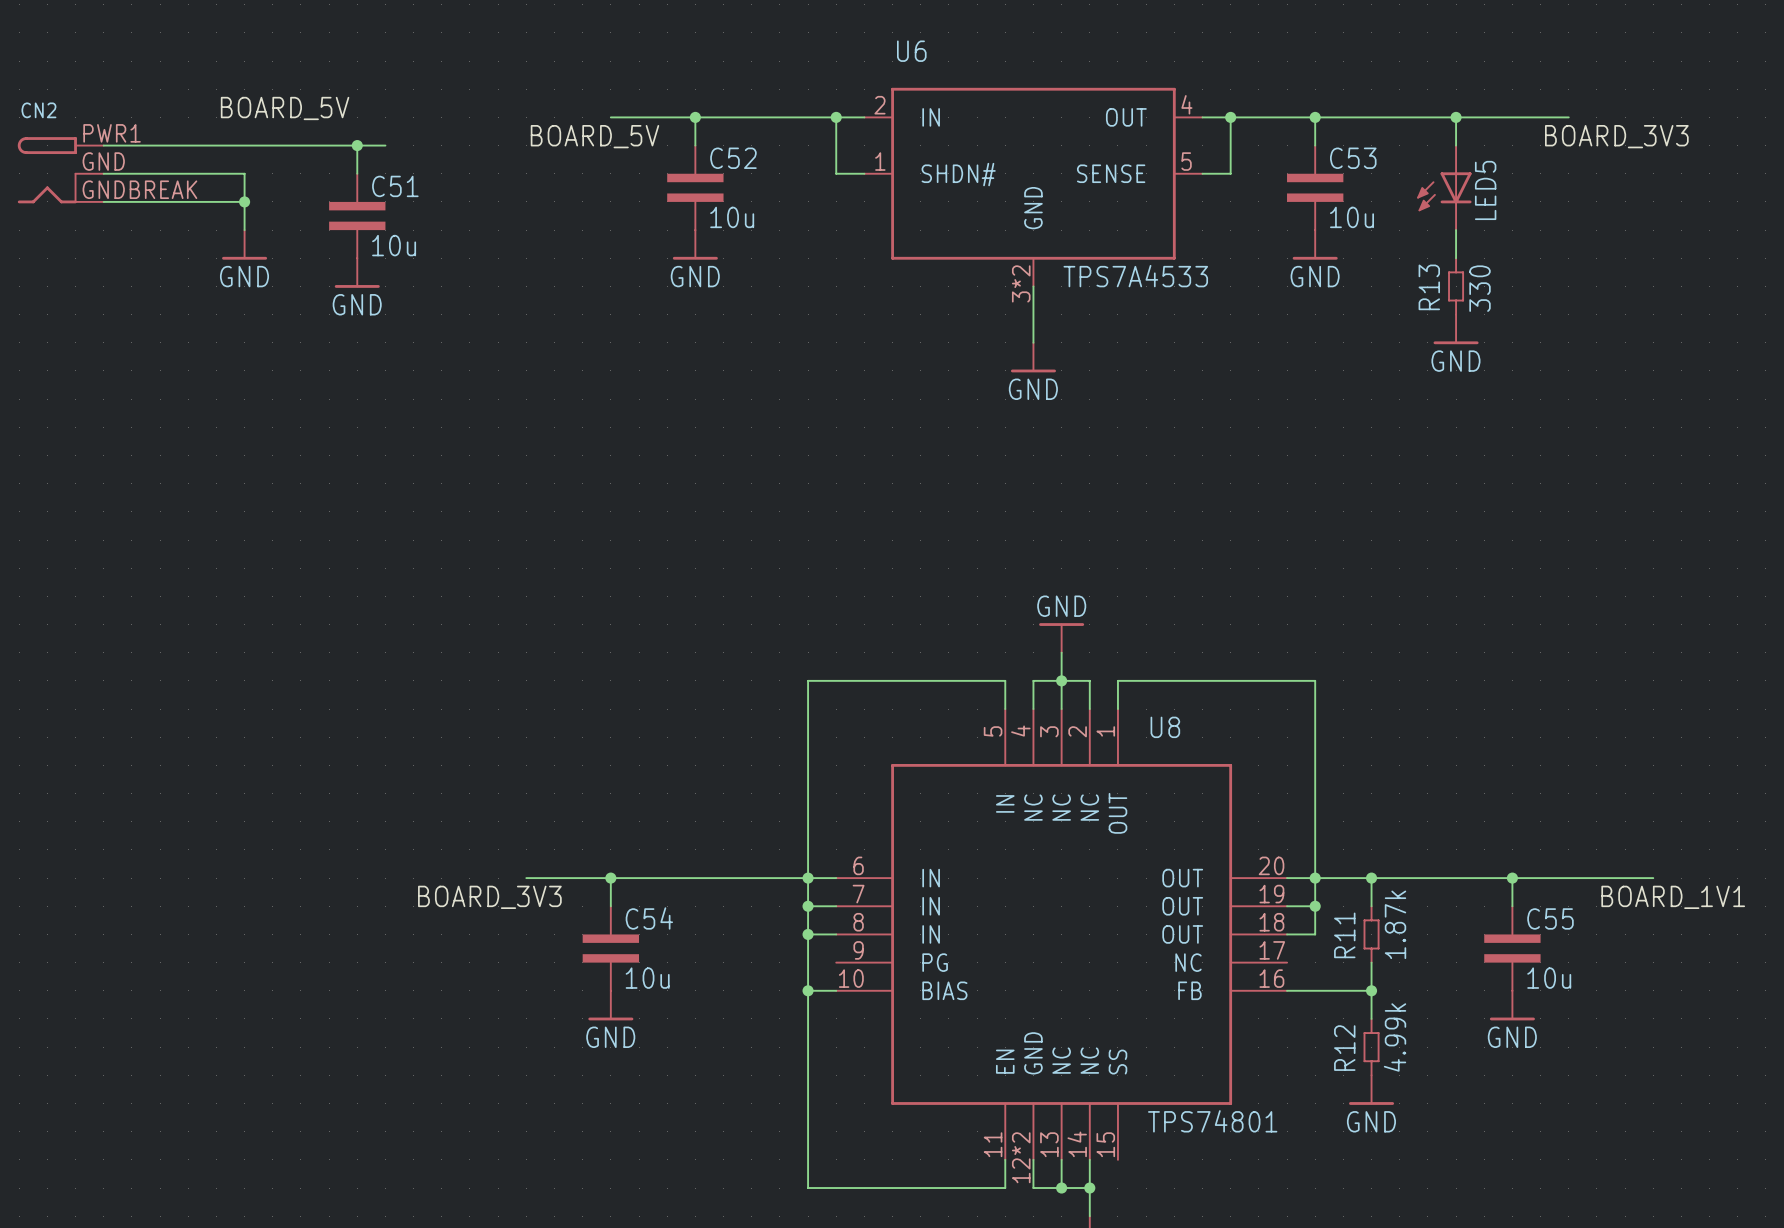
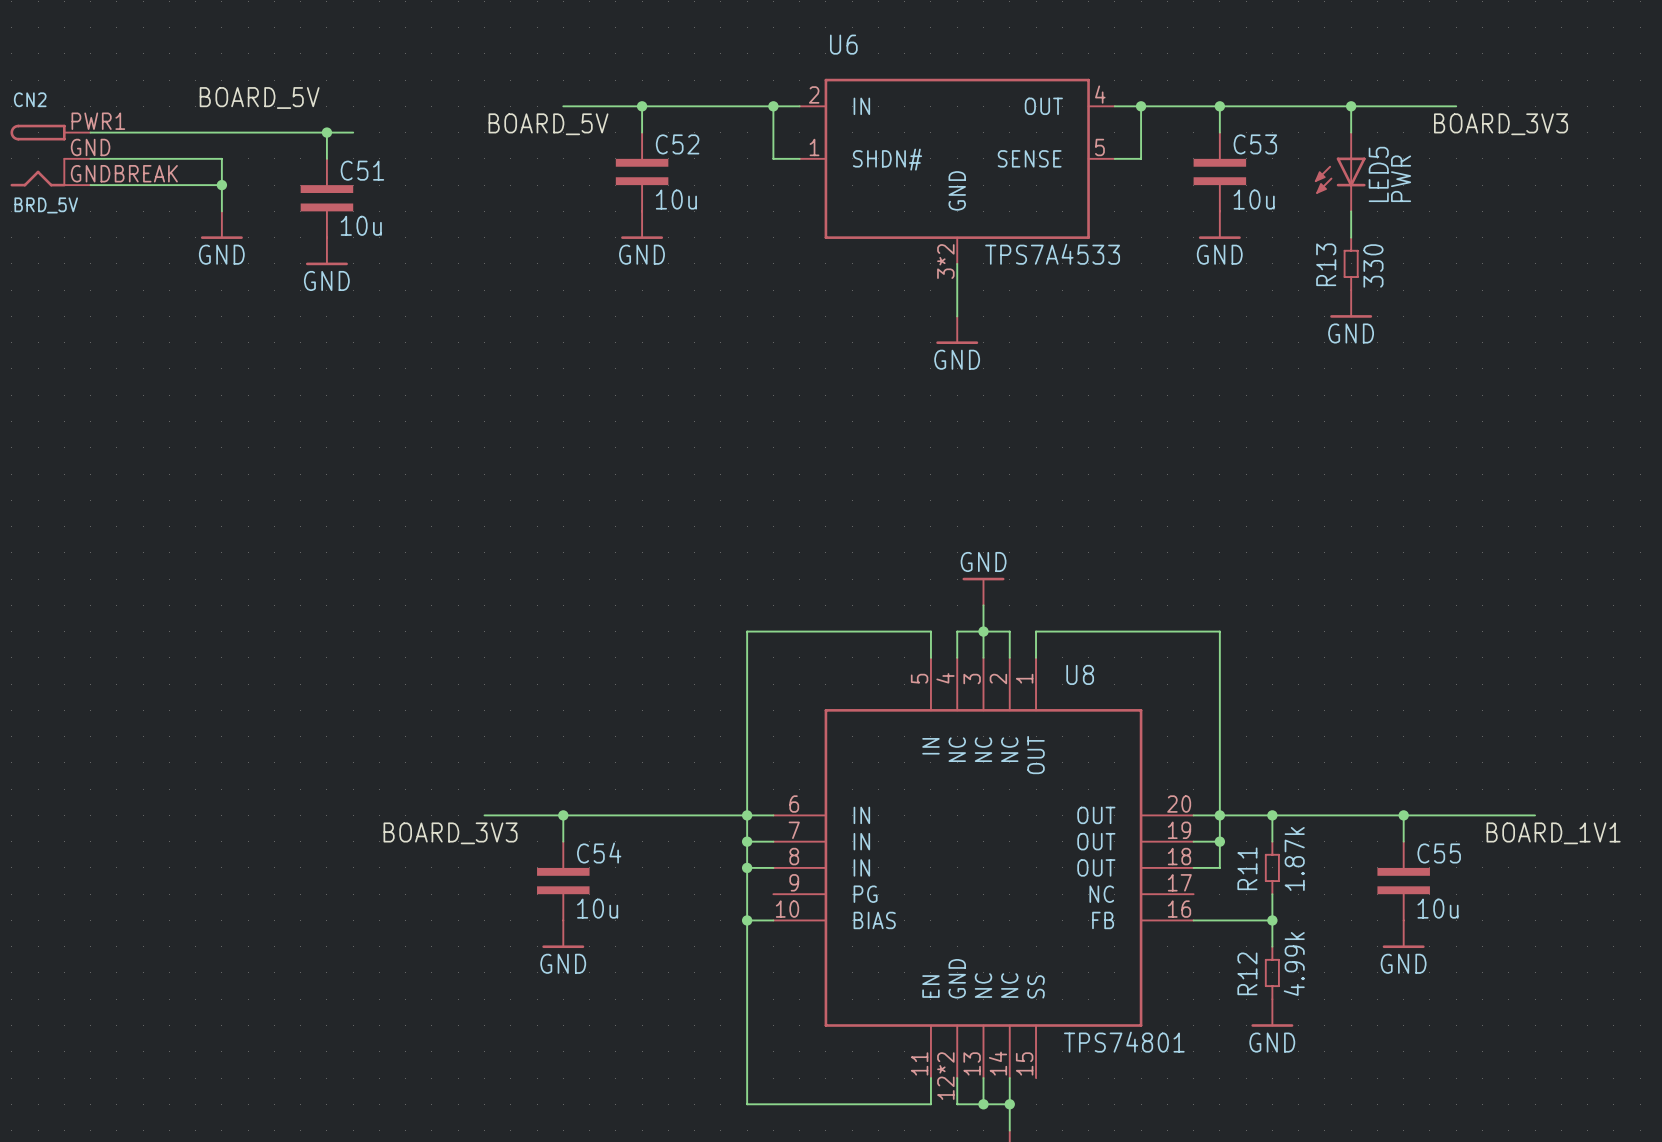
LED5 value: none -> PWR (1401, 178)
CN2 value: none -> BRD_5V (46, 205)

